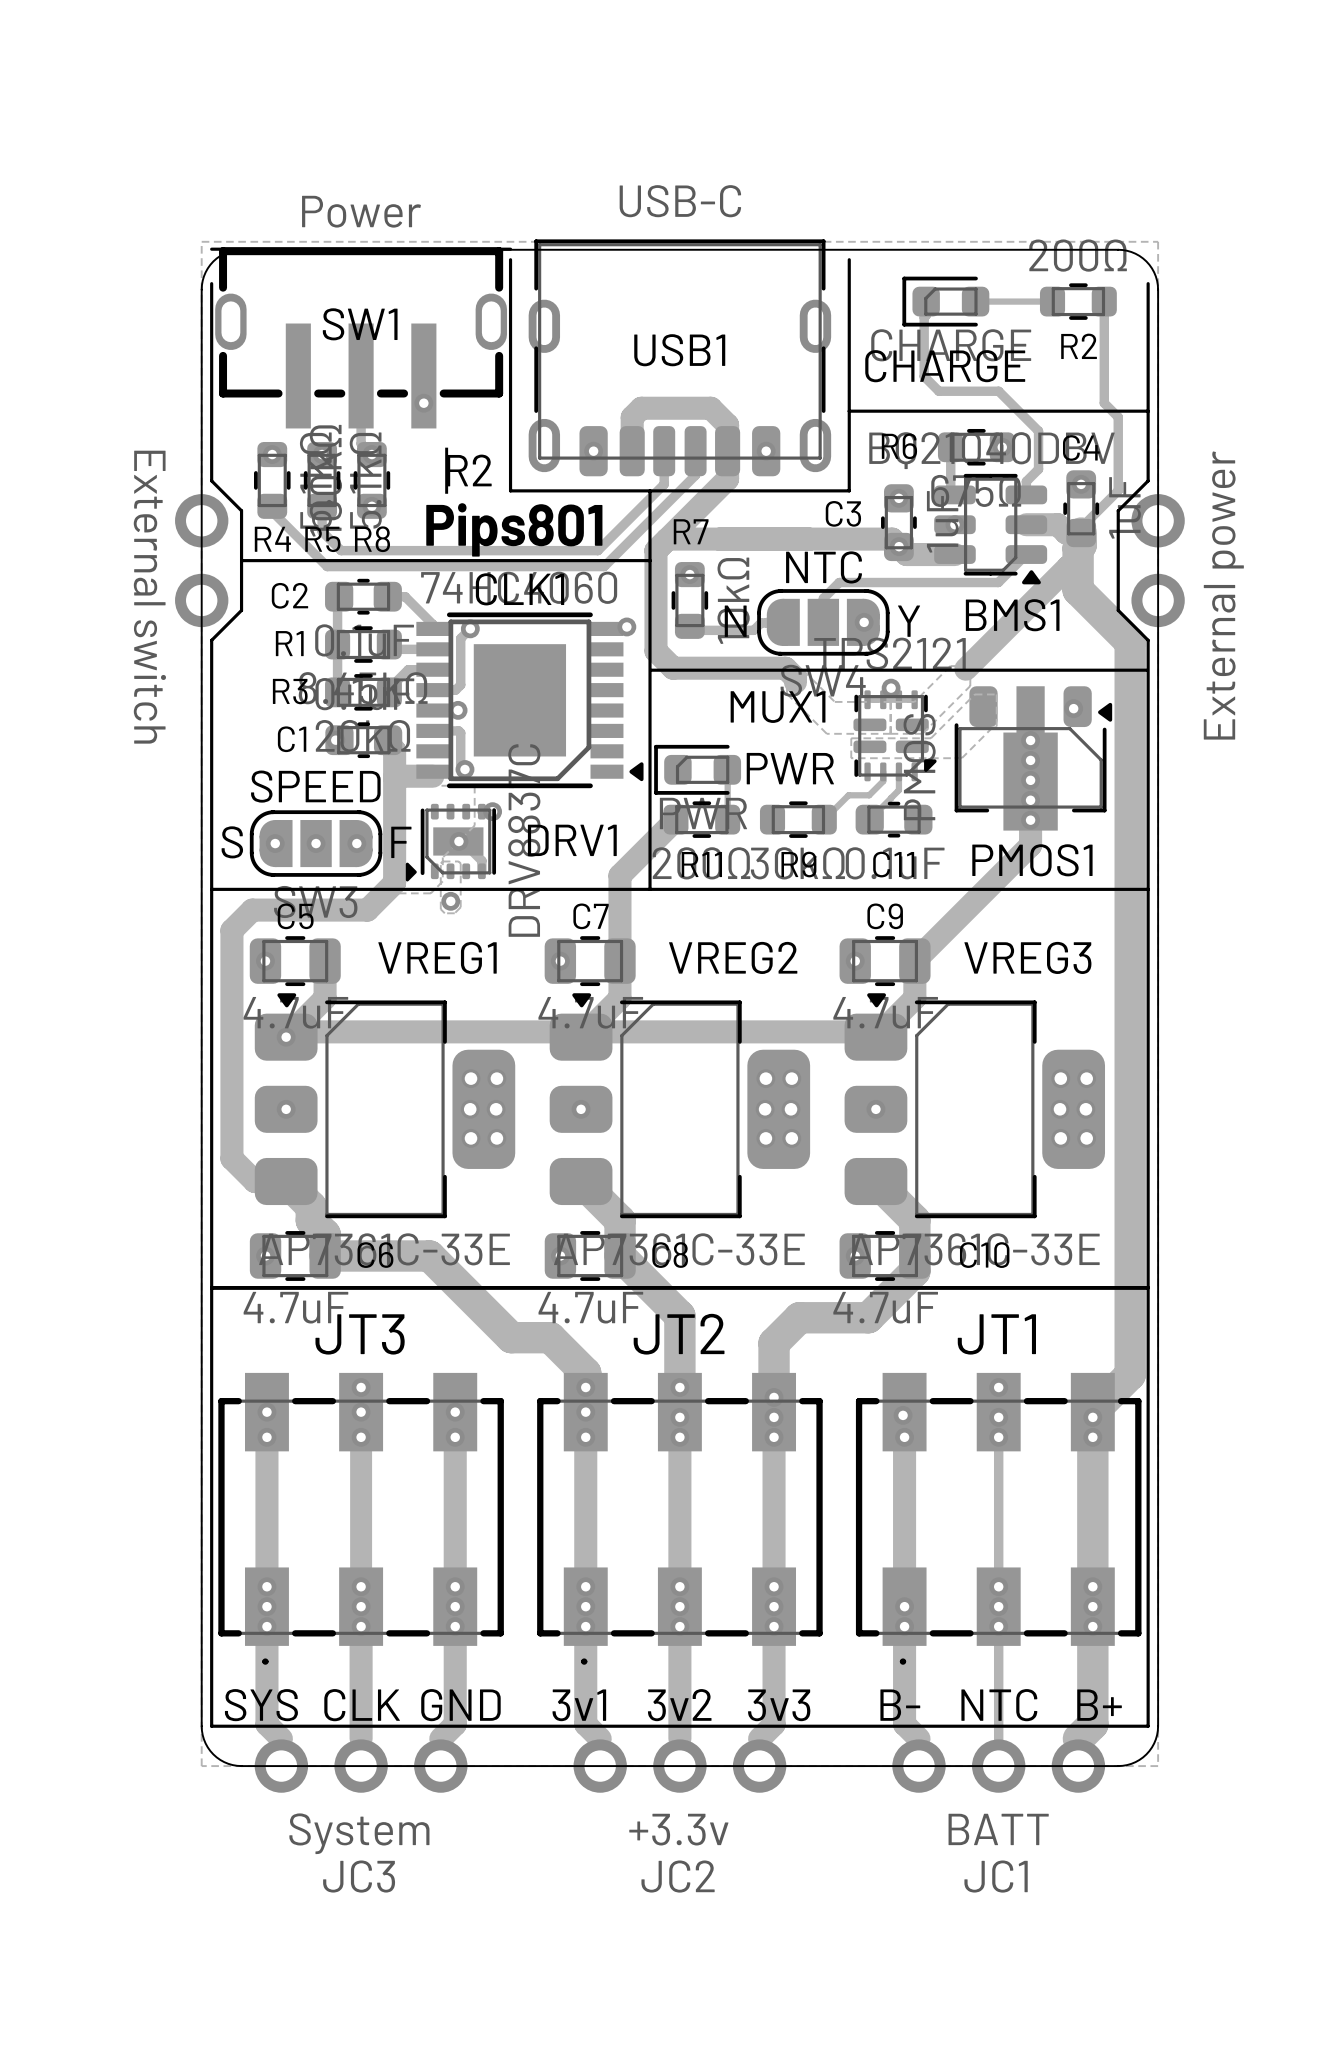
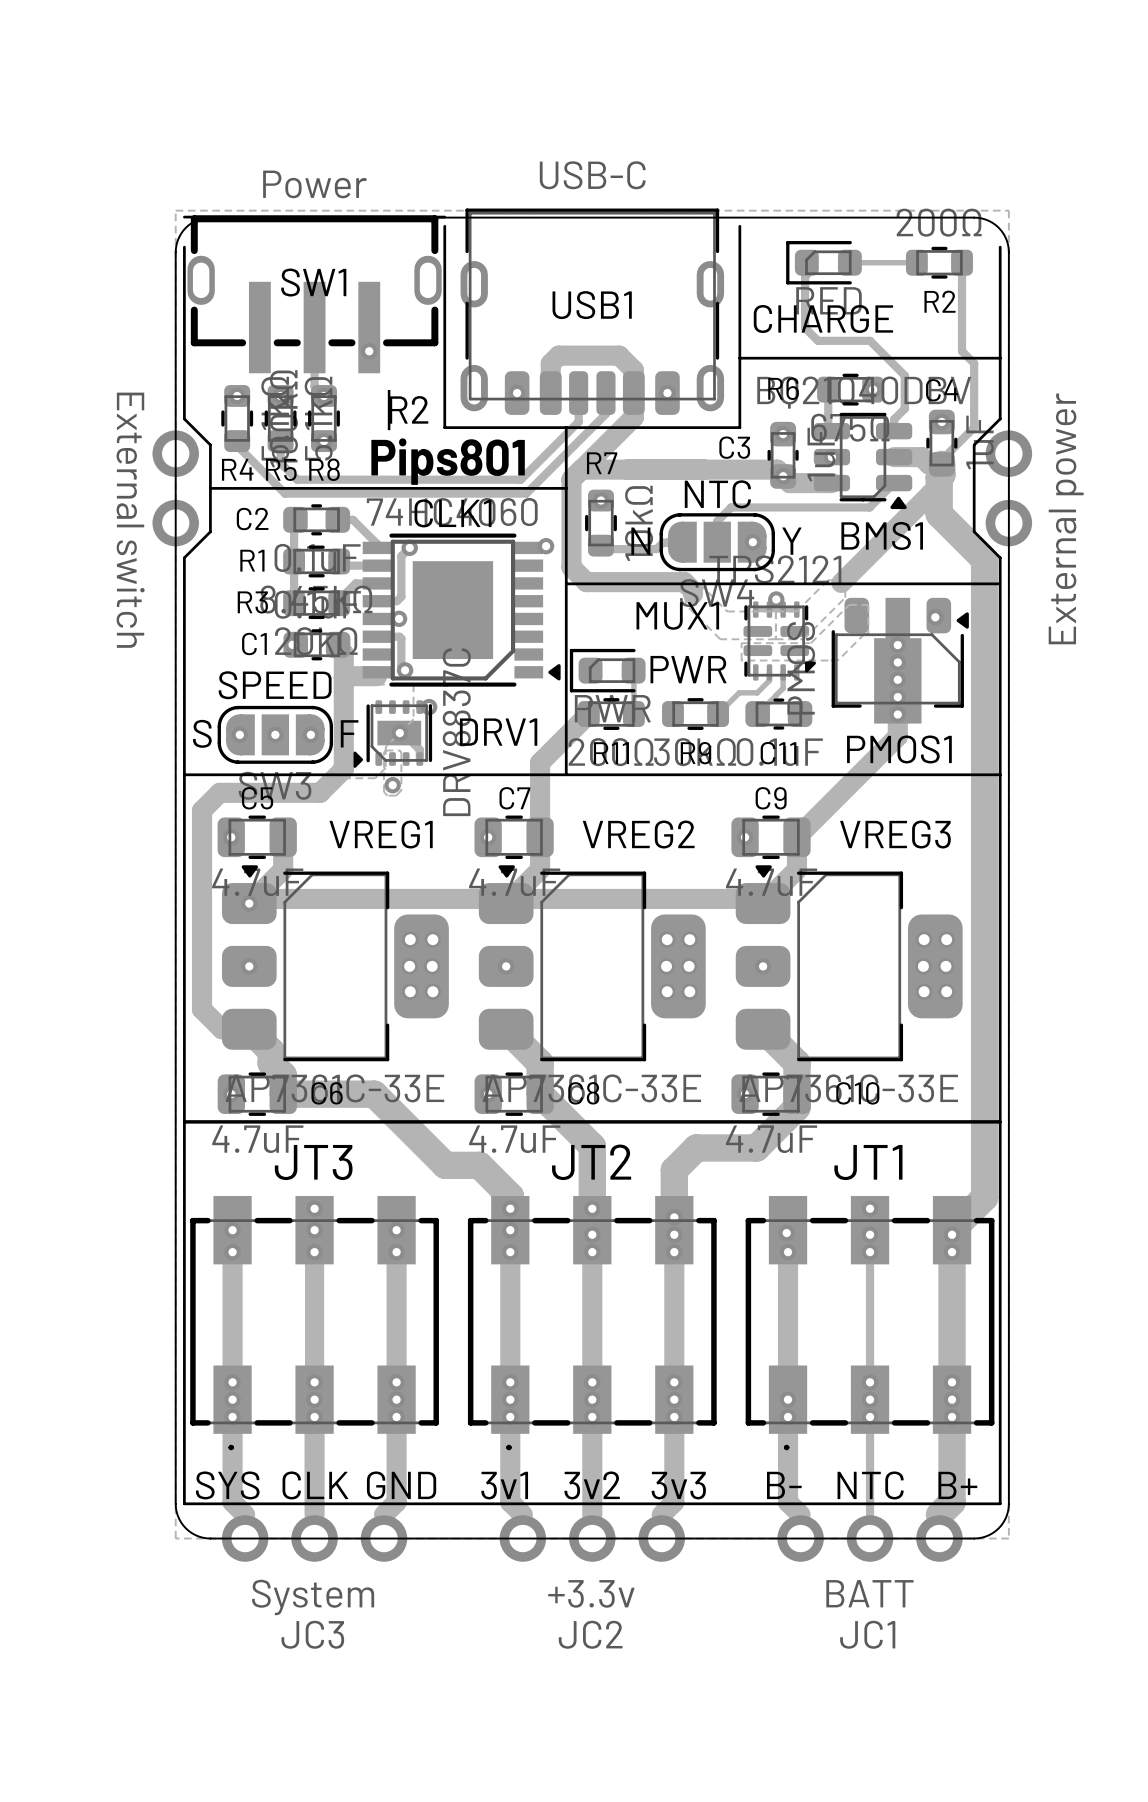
CHARGE value: CHARGE (951, 345) -> RED (828, 300)

